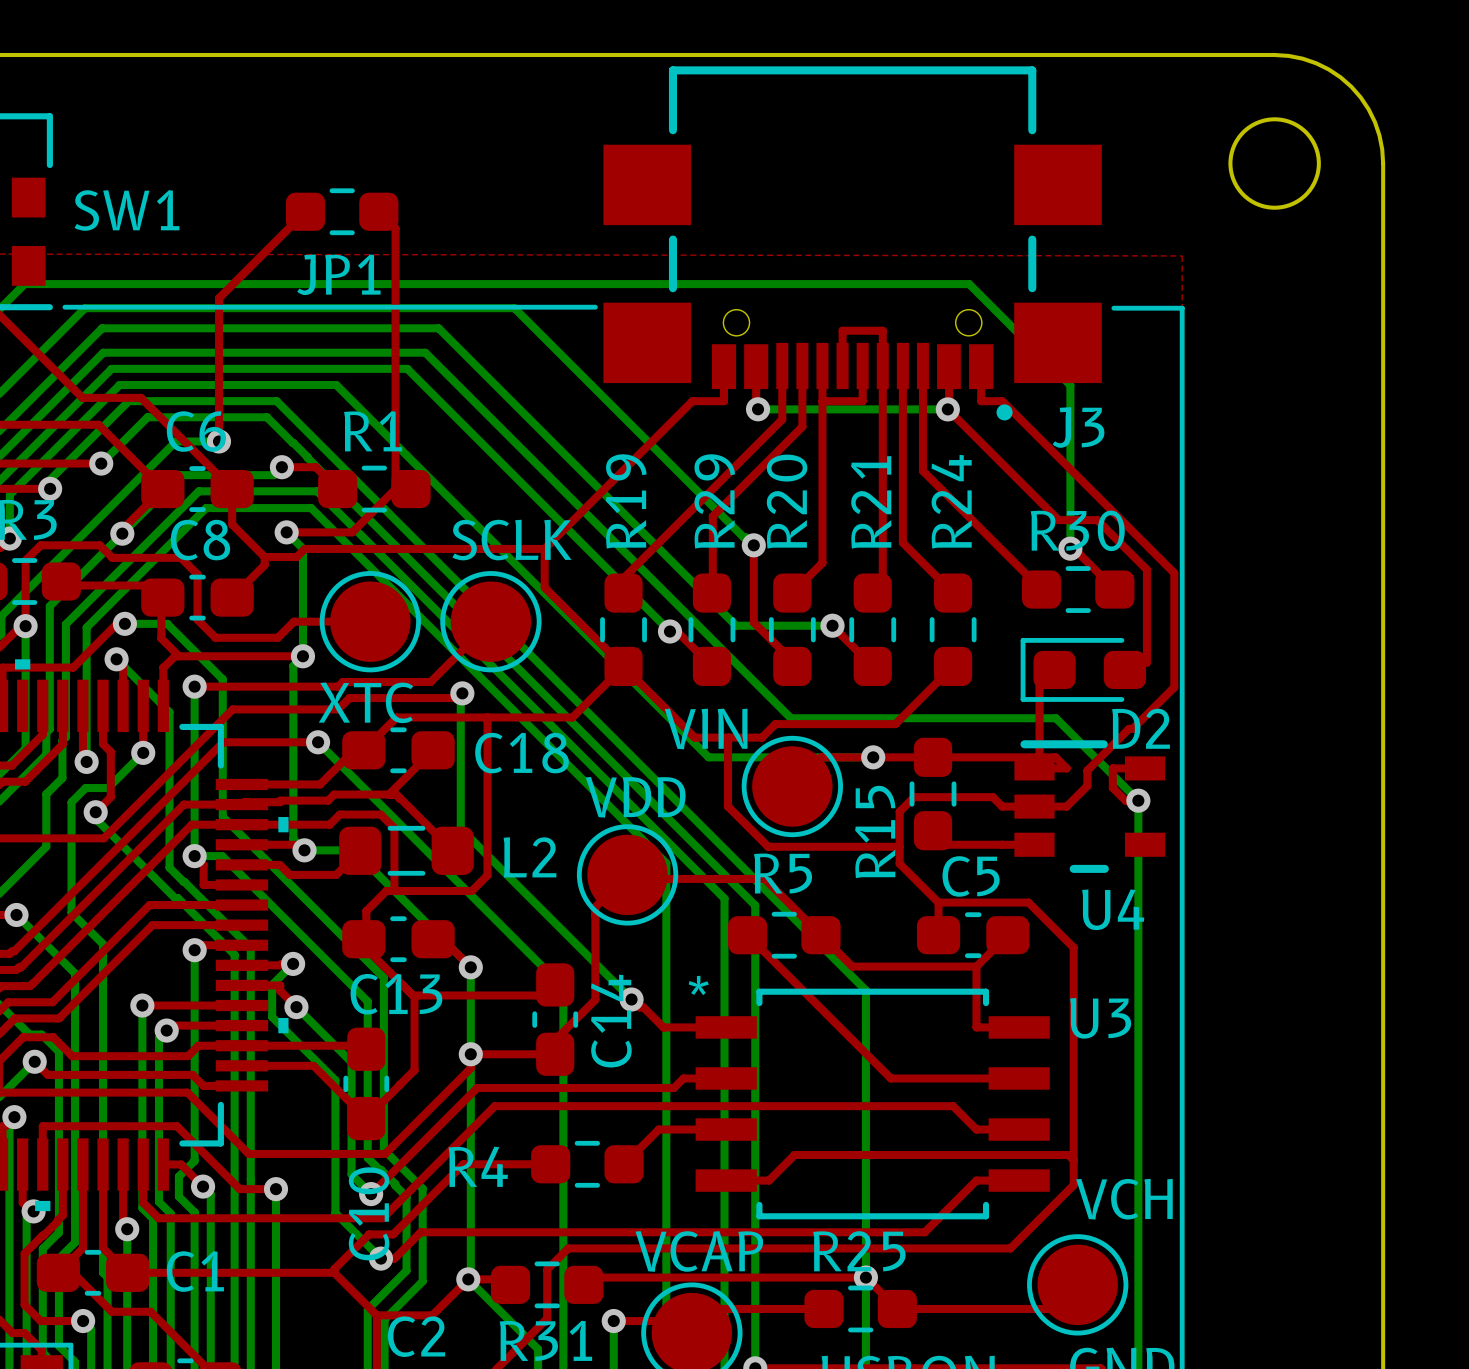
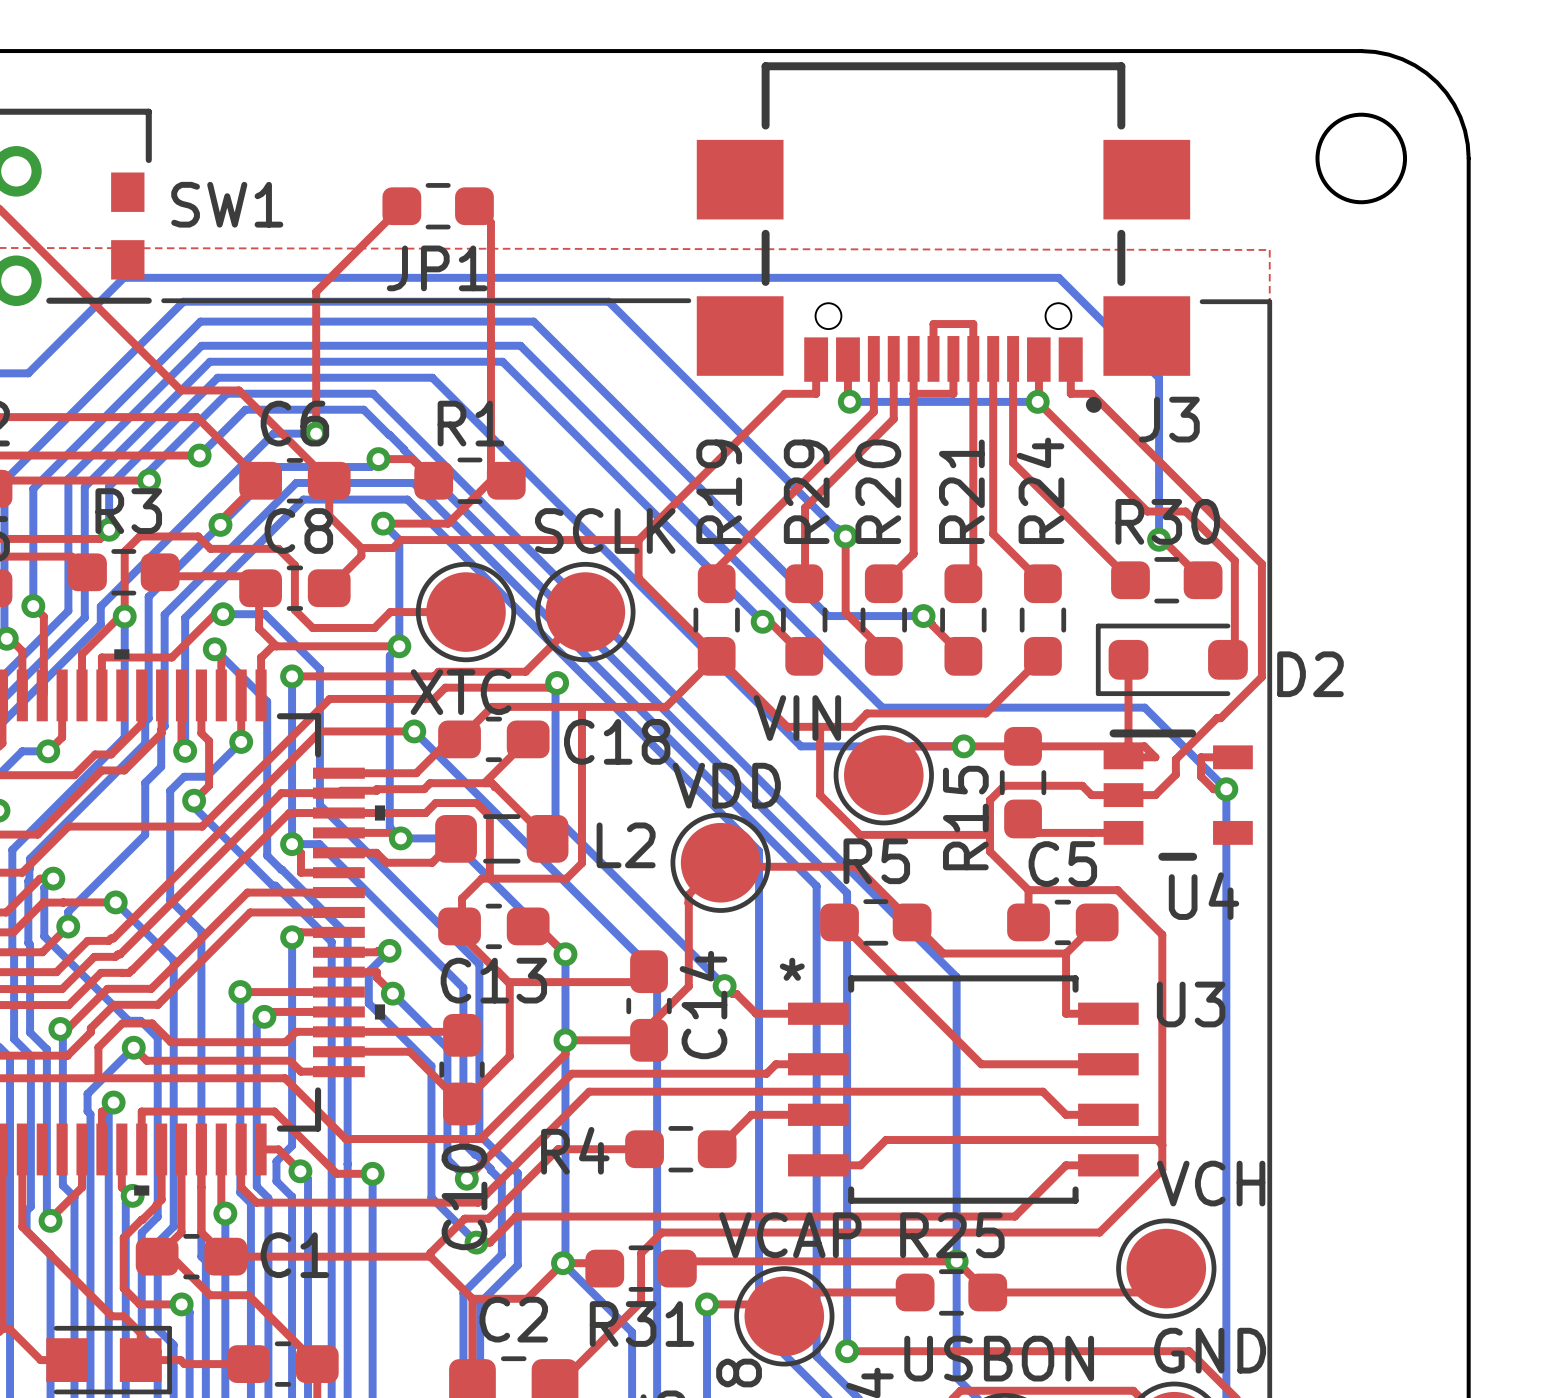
D2 footprint: [1020, 637, 1147, 702] -> [1095, 623, 1248, 697]
D2 name position: D2 (1141, 728) -> D2 (1310, 674)

